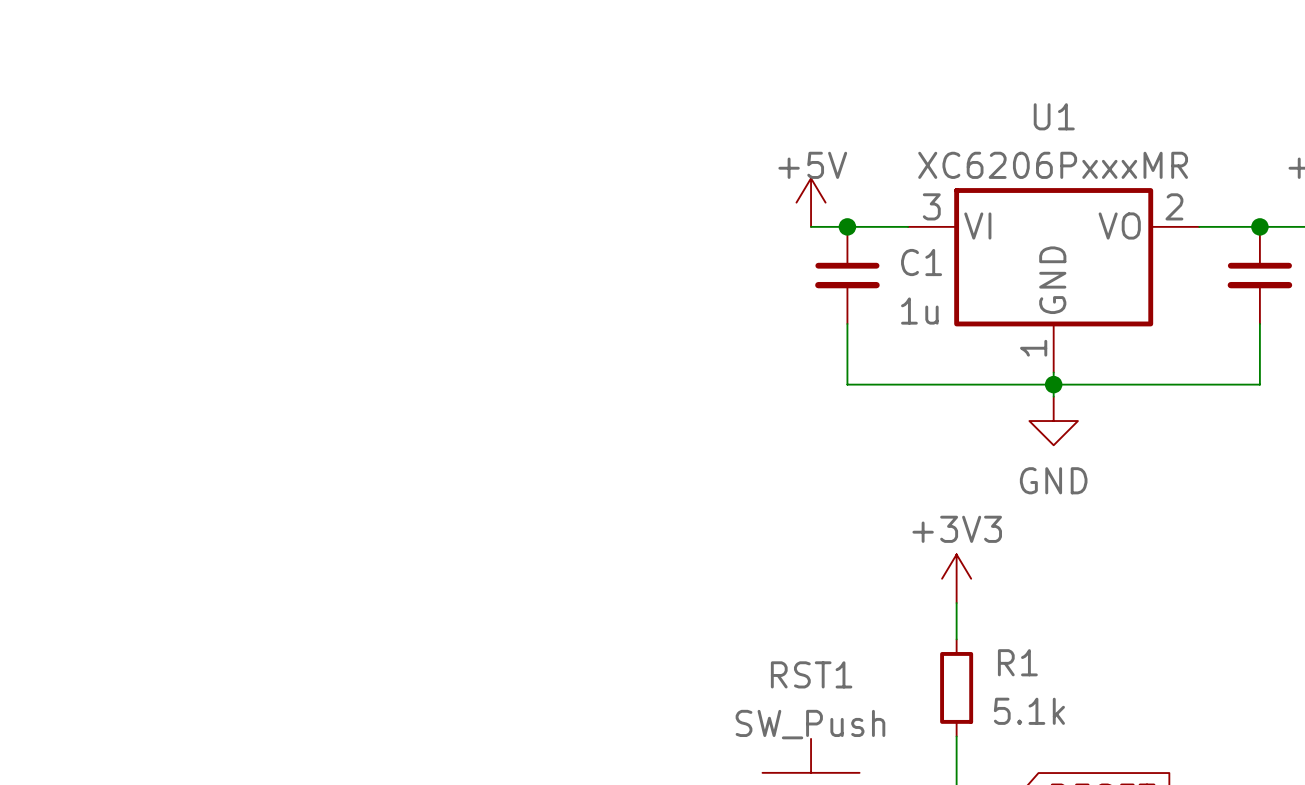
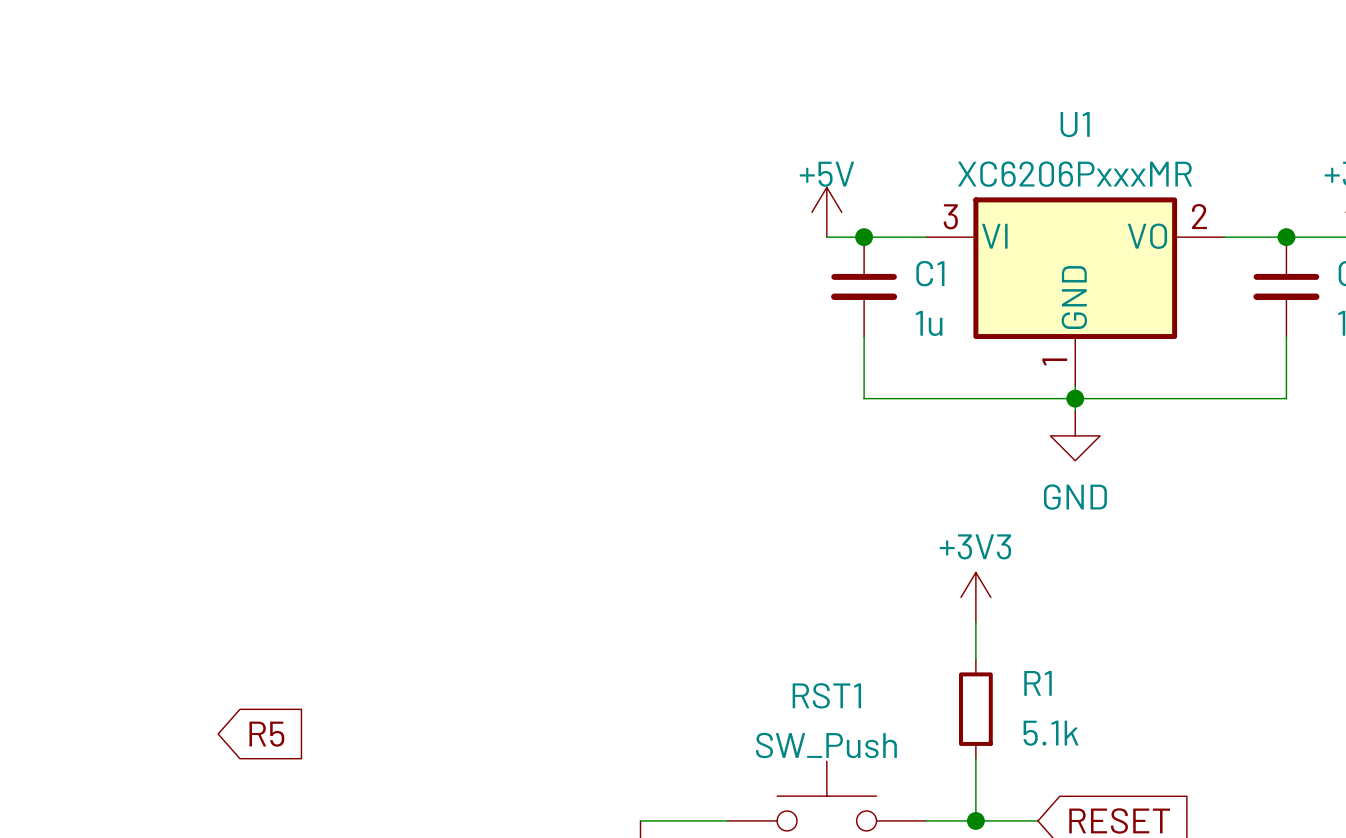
global label: none -> R5 (266, 734)

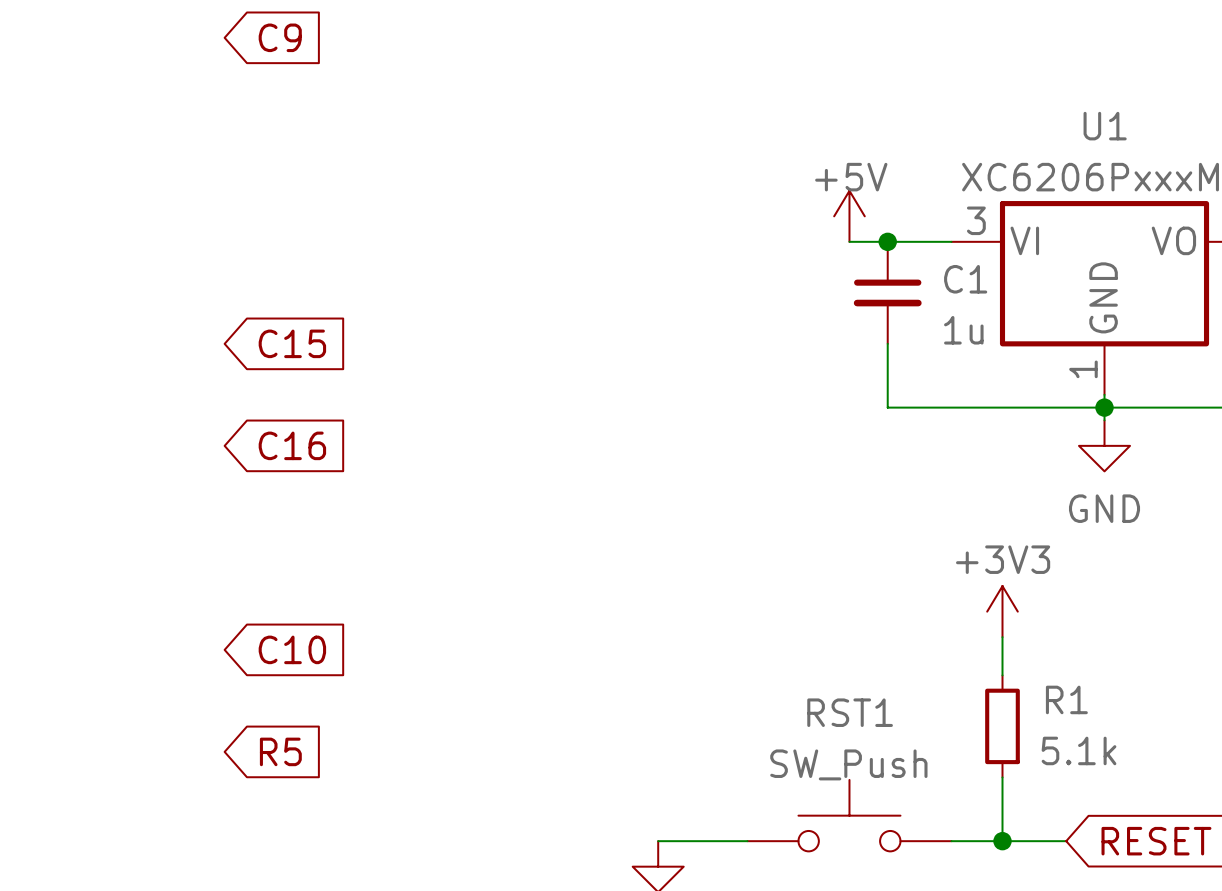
global label: none -> C9 (280, 37)
global label: none -> C15 (292, 343)
global label: none -> C16 (292, 445)
global label: none -> C10 (292, 649)

